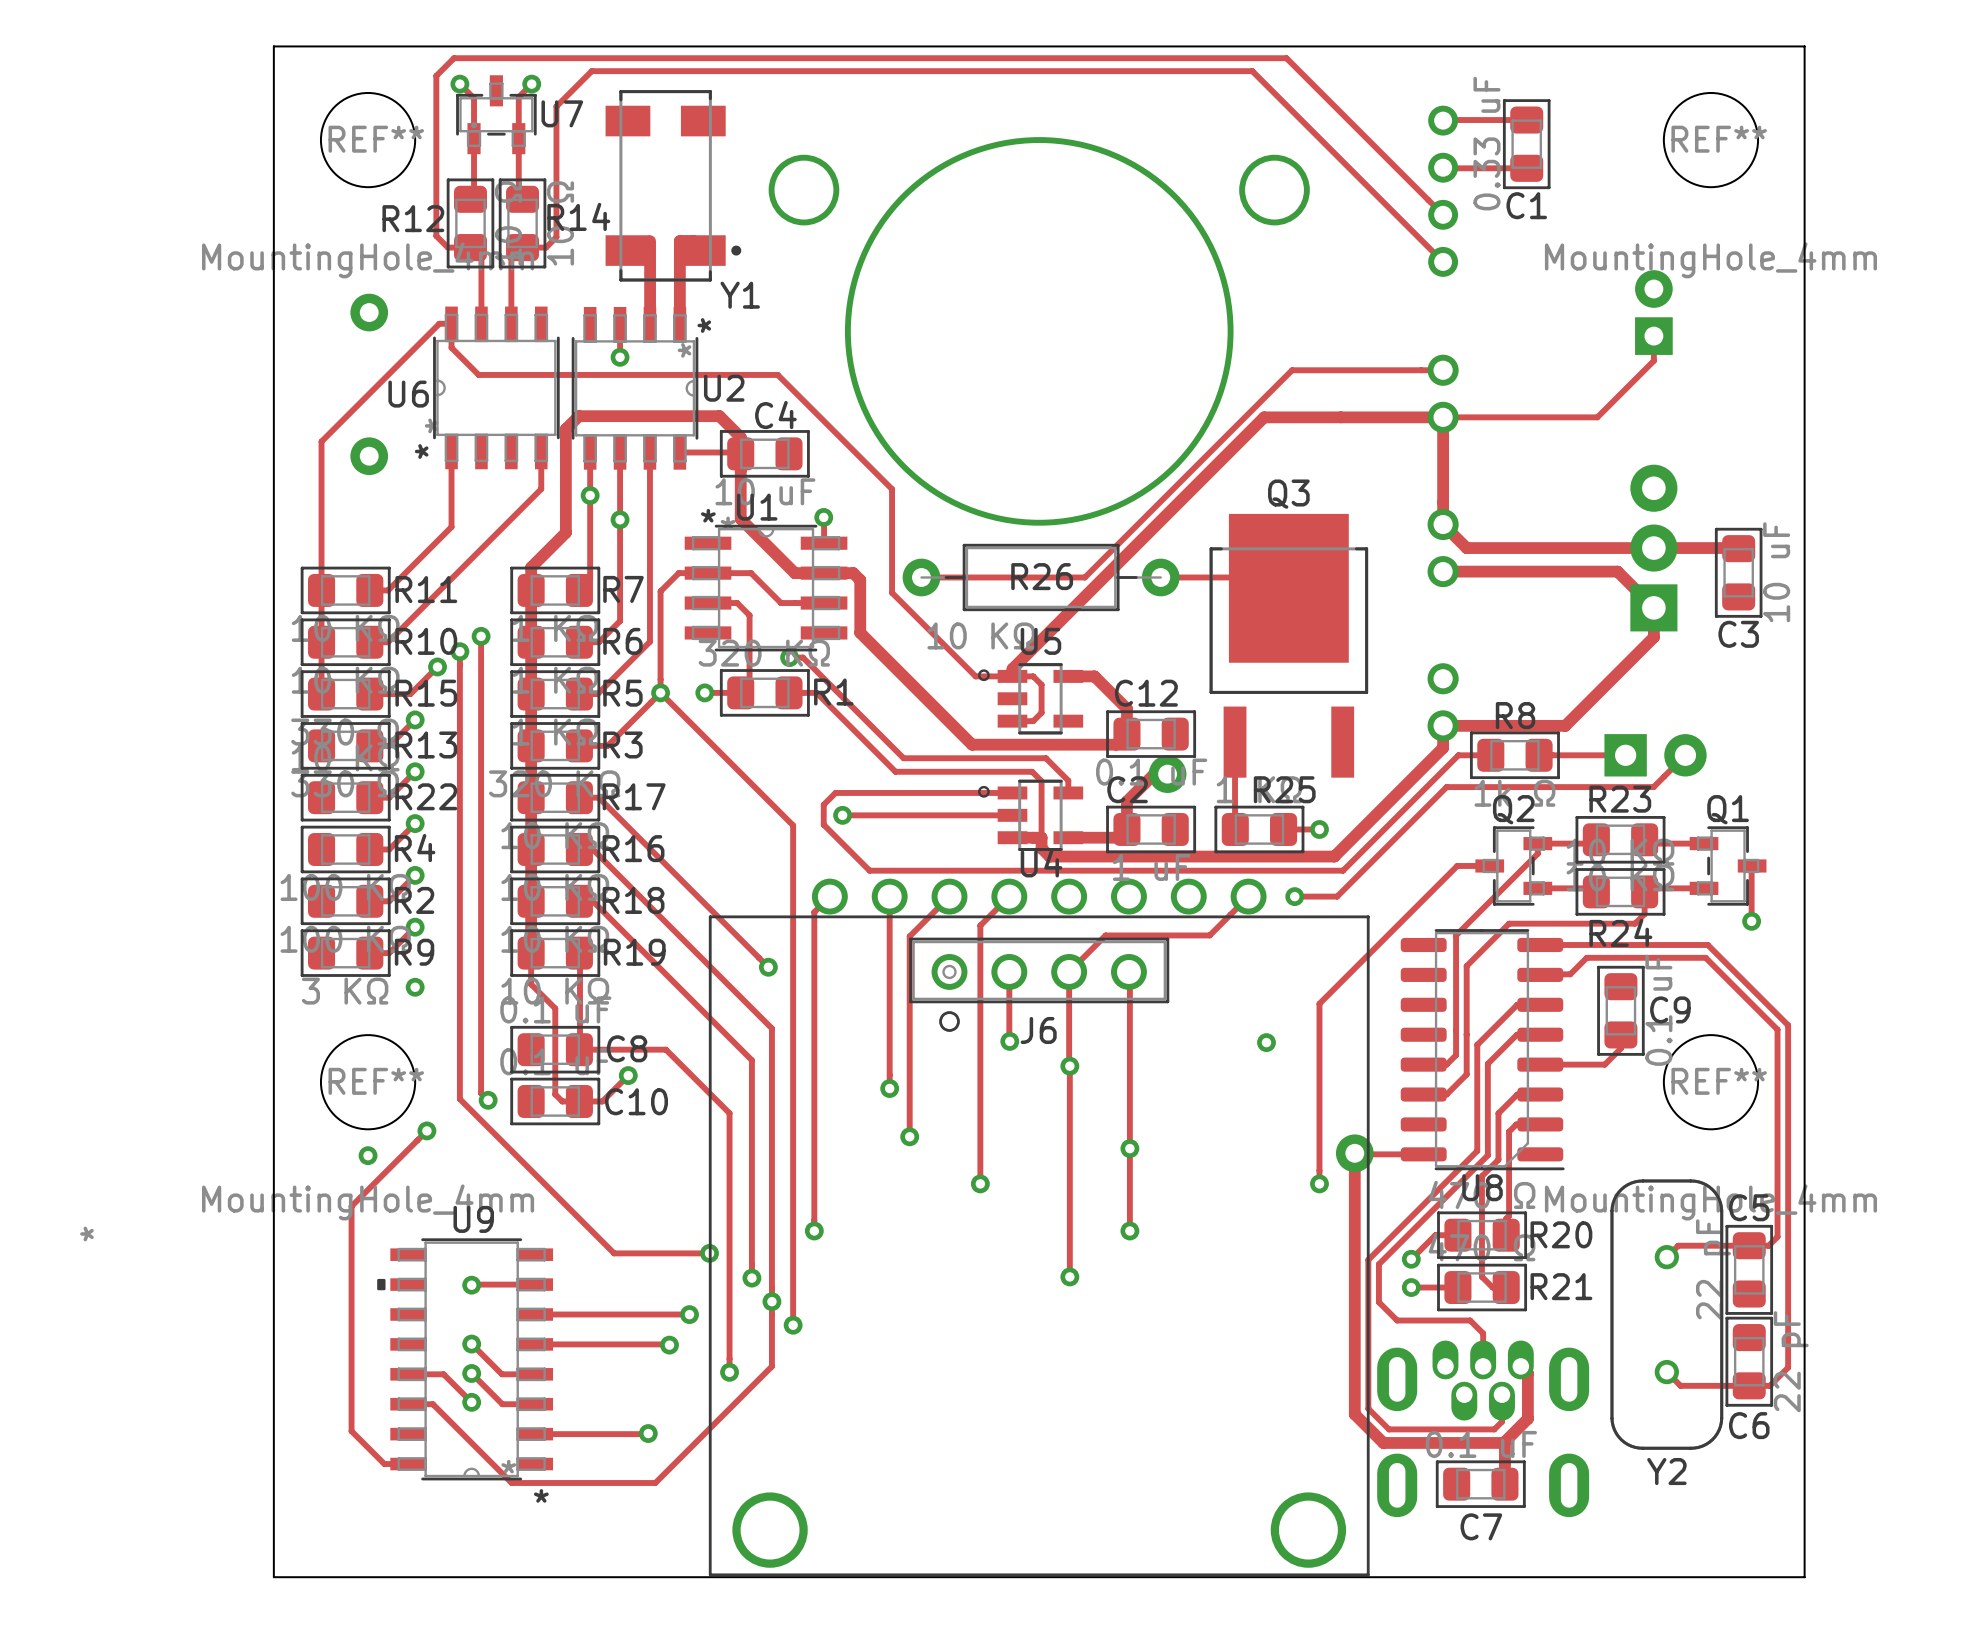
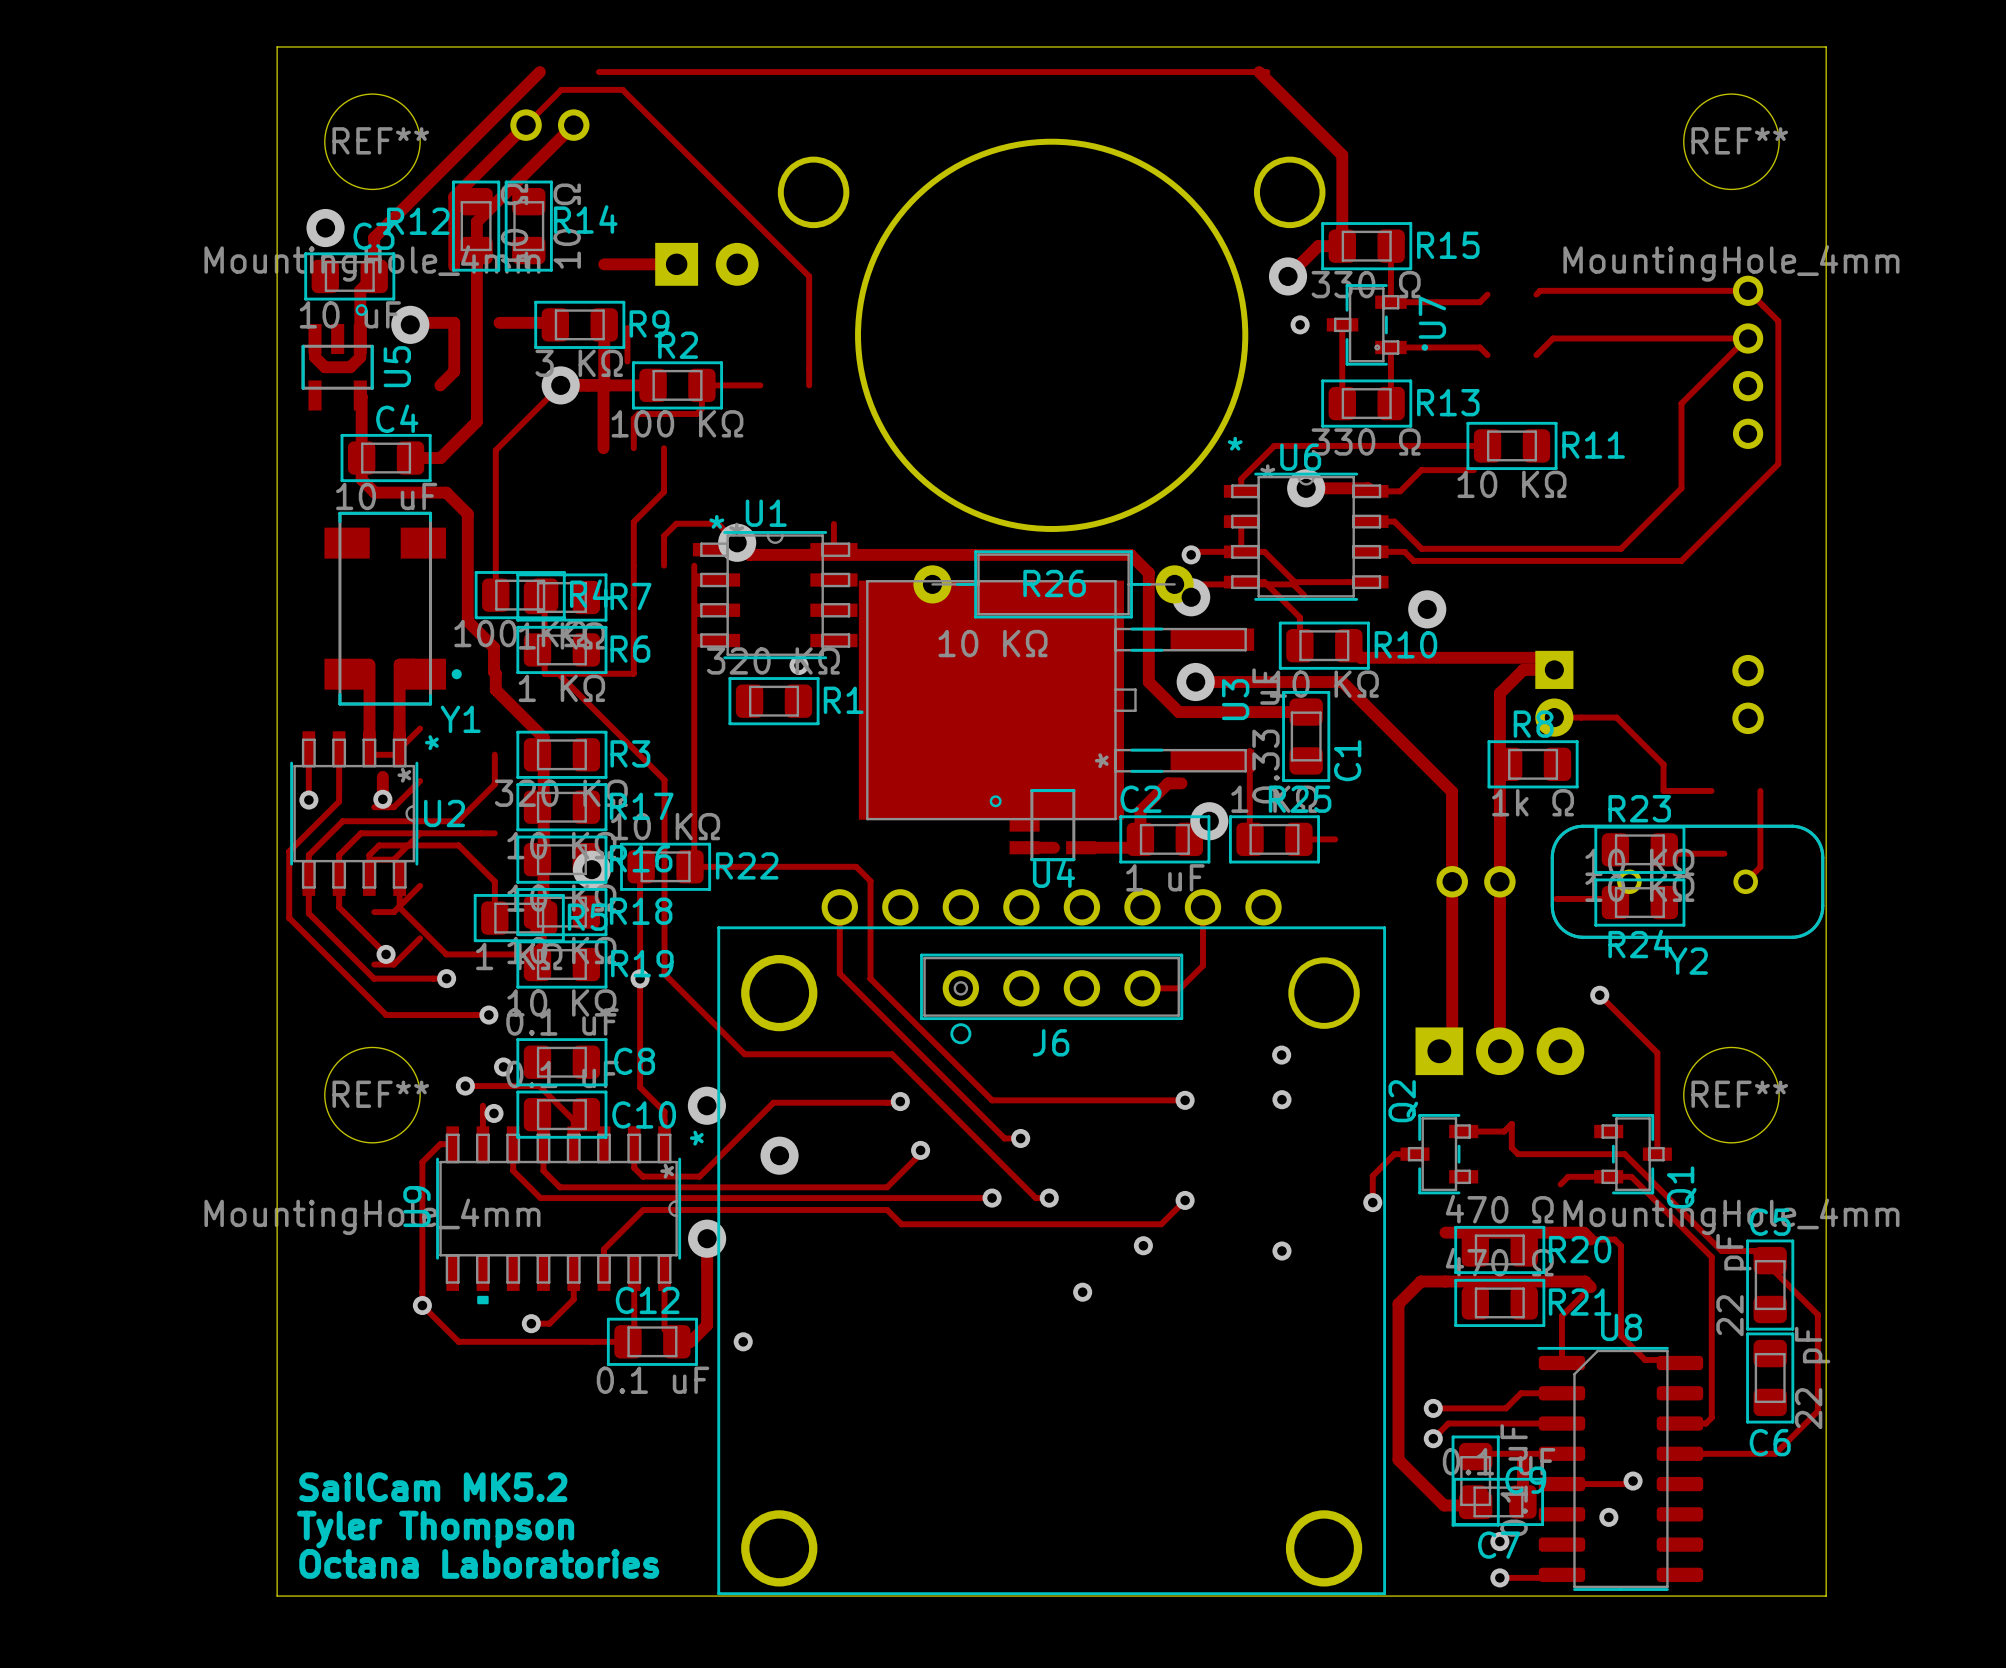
track: none -> (539, 72) (374, 237) (374, 276) (360, 290) (360, 357) (350, 367) (325, 367) (315, 357) (315, 339)
track: (591, 71) (556, 106) (556, 237) (546, 247) (522, 247) (511, 258) (511, 323) -> none
track: none -> (1259, 72) (1342, 155) (1342, 246) (1318, 246) (1288, 276)
track: (1252, 71) (1443, 261) -> none
U7 footprint: [456, 75, 537, 155] -> [1326, 284, 1429, 366]
track: (459, 84) (474, 98) (474, 195) (470, 199) -> none
via: (459, 84) -> none
track: (531, 84) (518, 97) (518, 195) (522, 199) -> none
via: (531, 84) -> none
track: (1526, 120) (1443, 120) -> none
part: none -> (549, 125)
track: none -> (573, 125) (476, 221) (476, 421) (440, 458) (410, 458)
C1 position: (1526, 144) -> (1306, 736)
track: (1443, 167) (1526, 168) -> none
Y1 position: (673, 185) -> (393, 608)
part position: (1443, 191) -> (1748, 362)
C1 name rotation: 0° (1526, 205) -> 90° counterclockwise (1347, 760)
track: (1443, 214) (1286, 58) (454, 58) (436, 75) (436, 236) (447, 247) (470, 247) (481, 258) (481, 323) -> none
via: none -> (325, 228)
track: none -> (1390, 240) (1390, 302) (1479, 302) (1487, 294)
track: (650, 241) (650, 325) -> (369, 664) (369, 749)
track: (703, 250) (693, 241) (679, 241) (679, 325) -> (423, 674) (413, 664) (399, 664) (399, 749)
track: none -> (604, 264) (676, 264)
part: none -> (706, 264)
track: none -> (454, 266) (454, 196) (561, 89) (622, 89) (809, 276) (809, 385)
via: none -> (1288, 276)
track: none -> (1536, 294) (1540, 290) (1748, 290) (1778, 321) (1778, 464) (1681, 560) (1413, 560) (1404, 551) (1371, 551)
U6 footprint: [433, 306, 560, 470] -> [1223, 472, 1389, 601]
via position: (369, 312) -> (410, 324)
part rotation: 0° (1653, 312) -> 180° (1554, 693)
part position: (1653, 312) -> (1554, 693)
track: none -> (499, 322) (553, 322) (555, 324)
track: none -> (410, 324) (412, 322) (454, 322) (454, 371) (440, 385)
track: none -> (604, 324) (603, 448)
via: none -> (1300, 324)
track: none -> (1342, 325) (1342, 409)
U2 text position: * (704, 325) -> * (431, 742)
track: none -> (1746, 338) (1681, 403) (1681, 488) (1620, 548) (1421, 548) (1394, 521) (1371, 521)
track: none -> (1748, 338) (1553, 338) (1536, 355)
track: (1653, 336) (1653, 360) (1597, 417) (1443, 417) -> none
track: none -> (1487, 355) (1479, 347) (1390, 347) (1390, 409)
via: (620, 357) -> none
track: (1443, 370) (1292, 370) (1084, 577) (921, 577) -> none
via: none -> (560, 385)
track: none -> (653, 385) (560, 385) (495, 450) (495, 595)
track: none -> (760, 385) (701, 385) (701, 408) (696, 414) (638, 414) (633, 418) (633, 448)
U2 position: (635, 388) -> (354, 813)
track: none -> (360, 395) (361, 479) (374, 492) (446, 492) (467, 514) (467, 621) (493, 647) (495, 689) (543, 737) (543, 942) (531, 954) (446, 954) (399, 907) (399, 878)
part: (1443, 393) -> none
U6 name position: U6 (408, 394) -> U6 (1300, 457)
track: (1443, 417) (1443, 524) (1466, 548) (1738, 548) -> none
track: (1443, 417) (1264, 417) (1012, 668) (1012, 676) -> none
track: none -> (664, 448) (664, 491) (633, 522) (633, 673) (544, 673) (544, 595)
track: none -> (1487, 451) (1481, 445) (1274, 445) (1241, 479) (1241, 491)
track: (451, 452) (451, 526) (388, 590) (369, 590) -> none
track: (541, 452) (541, 489) (388, 642) (369, 642) -> none
track: (590, 452) (590, 579) (579, 590) -> none
track: (620, 452) (620, 621) (598, 642) (579, 642) -> none
track: (649, 452) (649, 641) (597, 694) (579, 694) -> none
track: (679, 452) (740, 453) -> none
C4 position: (764, 453) -> (386, 458)
via: (369, 456) -> none
track: none -> (1473, 470) (1421, 470) (1400, 491) (1371, 491) (1368, 488) (1306, 488)
via: none -> (1306, 488)
via: (590, 495) -> none
track: none -> (1241, 521) (1241, 551)
via: (823, 517) -> none
via: (620, 519) -> none
via: none -> (737, 542)
track: none -> (1191, 554) (1194, 551) (1264, 551) (1294, 582) (1371, 582)
via: none -> (1191, 554)
part: (1443, 548) -> none
part rotation: 0° (1653, 548) -> 90° clockwise (1499, 1051)
part position: (1653, 548) -> (1499, 1051)
track: none -> (664, 565) (664, 536) (676, 523) (718, 523) (749, 554) (1130, 554) (1148, 573) (1148, 682) (1178, 712) (1306, 712)
track: none -> (694, 565) (694, 862) (690, 866)
track: (1443, 571) (1617, 571) (1653, 607) (1653, 637) (1565, 725) (1443, 725) (1443, 747) (1334, 856) (1049, 856) (1041, 848) (1041, 781) (1032, 771) (895, 771) (816, 692) (789, 692) -> none
C3 rotation: 0° (1738, 572) -> 90° clockwise (349, 276)
C3 position: (1738, 572) -> (349, 276)
track: none -> (1241, 582) (1264, 582) (1299, 617) (1299, 645)
R11 position: (345, 590) -> (1511, 445)
via: none -> (1191, 597)
via: none -> (1427, 609)
track: (708, 603) (737, 603) (749, 615) (749, 684) (740, 692) (704, 692) -> none
track: (824, 603) (781, 603) (751, 573) (678, 573) (660, 591) (660, 692) -> none
C3 name position: C3 (1738, 634) -> C3 (373, 236)
track: (481, 636) (481, 1093) (488, 1100) -> none
via: (481, 636) -> none
track: none -> (1348, 645) (1360, 657) (1542, 657) (1554, 669) (1523, 669) (1499, 693) (1499, 1051)
R10 position: (345, 642) -> (1324, 645)
Q3: (1288, 645) -> none
track: (459, 651) (459, 1099) (614, 1253) (709, 1253) -> none
via: (459, 651) -> none
track: (789, 657) (802, 657) (903, 758) (1045, 758) (1068, 780) (1068, 792) -> none
track: none -> (558, 673) (664, 779) (664, 974) (744, 1054) (892, 1054) (1035, 1198) (1049, 1198)
track: (437, 666) (410, 694) (369, 694) -> none
via: (437, 666) -> none
track: none -> (1195, 682) (1342, 682) (1452, 791) (1452, 881)
via: none -> (1195, 682)
track: (1068, 676) (1094, 676) (1126, 708) (1126, 734) (1116, 744) (972, 744) (860, 632) (860, 580) (853, 573) (794, 573) (740, 519) (740, 437) (719, 416) (578, 416) (565, 429) (565, 532) (531, 567) (531, 984) (555, 1008) (555, 1094) (562, 1101) (602, 1101) (628, 1075) -> none
part: none -> (1748, 694)
U3: none -> (1056, 700)
track: (660, 692) (607, 745) (579, 745) -> none
track: (660, 692) (793, 825) (793, 1325) -> none
via: (660, 692) -> none
via: (704, 692) -> none
track: (321, 694) (321, 441) (439, 323) (451, 323) (451, 347) (478, 374) (777, 374) (892, 489) (892, 592) (975, 676) (1033, 676) (1041, 684) (1041, 712) (1033, 721) (1012, 721) -> none
R15 position: (345, 694) -> (1366, 246)
R5 position: (555, 694) -> (519, 918)
U5 rotation: 0° (1030, 698) -> 90° clockwise (337, 357)
U5 position: (1030, 698) -> (337, 357)
part: (1443, 702) -> none
track: none -> (1554, 717) (1616, 717) (1663, 764) (1663, 790) (1711, 790)
via: (415, 719) -> none
C12 position: (1151, 734) -> (652, 1341)
track: none -> (308, 748) (308, 799)
track: none -> (339, 748) (339, 801) (289, 851) (289, 918) (386, 1015) (488, 1015)
R13 position: (345, 745) -> (1366, 403)
track: none -> (494, 754) (494, 784) (457, 821) (342, 821) (308, 855) (308, 913) (373, 978) (446, 978)
track: (1490, 755) (1458, 755) (1343, 870) (869, 870) (823, 824) (823, 804) (835, 792) (1012, 792) -> none
track: (1539, 755) (1625, 755) -> none
part: (1655, 755) -> none
track: (1685, 755) (1653, 787) (1446, 787) (1337, 896) (1294, 896) -> none
track: none -> (382, 776) (382, 800)
via: (415, 771) -> none
via position: (1167, 774) -> (1209, 821)
track: none -> (1760, 790) (1760, 867) (1745, 881)
via: none -> (382, 799)
via: none -> (308, 800)
R22 position: (345, 797) -> (665, 866)
track: (579, 797) (598, 797) (768, 967) -> none
Q2 name rotation: 0° (1513, 809) -> 90° counterclockwise (1403, 1101)
Q1 name rotation: 0° (1728, 809) -> 90° counterclockwise (1681, 1187)
Q1 name position: Q1 (1728, 809) -> Q1 (1681, 1187)
track: (842, 815) (1012, 815) -> none
via: (842, 815) -> none
via: (415, 823) -> none
track: none -> (494, 833) (360, 833) (339, 855) (339, 907) (386, 954)
via: (1319, 829) -> none
track: (1596, 839) (1592, 843) (1537, 843) (1537, 853) (1456, 935) (1456, 1055) (1446, 1064) (1423, 1064) -> none
R4 position: (345, 849) -> (520, 595)
track: (579, 849) (592, 849) (771, 1028) (771, 1366) (655, 1482) (511, 1482) (432, 1404) (407, 1404) -> none
track: none -> (641, 866) (640, 1087) (664, 1111) (664, 1144)
track: none -> (694, 866) (856, 866) (870, 881) (870, 978) (992, 1100) (1185, 1100)
via: none -> (591, 869)
track: (1489, 865) (1457, 865) (1319, 1003) (1319, 1183) -> none
Q2 position: (1513, 865) -> (1439, 1154)
Q1 position: (1728, 865) -> (1633, 1154)
track: (1752, 865) (1751, 921) -> none
track: none -> (369, 878) (369, 855) (379, 845) (458, 845) (494, 881) (494, 918)
track: none -> (1452, 881) (1452, 1038) (1439, 1051)
part: none -> (1476, 881)
via: (415, 875) -> none
track: (1704, 888) (1648, 888) (1644, 891) (1644, 914) (1635, 923) (1509, 923) (1466, 966) (1466, 1074) (1446, 1094) (1423, 1094) -> none
track: (829, 896) (814, 912) (814, 1231) -> none
track: (889, 896) (889, 1088) -> none
track: (949, 896) (909, 936) (909, 1136) -> none
track: (1009, 896) (980, 925) (980, 1183) -> (513, 1144) (513, 1170) (540, 1198) (991, 1198)
track: none -> (1202, 907) (1202, 965) (1180, 988) (1142, 988)
track: (1248, 896) (1209, 935) (1105, 935) (1069, 971) (1069, 1276) -> none
via: (1294, 896) -> none
R2 name position: R2 (414, 900) -> R2 (678, 345)
R2 position: (345, 901) -> (677, 385)
track: (579, 901) (592, 901) (751, 1060) (751, 1278) -> none
track: none -> (839, 917) (839, 973) (1004, 1138) (1020, 1138)
J6 footprint: [708, 915, 1370, 1577] -> [717, 926, 1387, 1596]
via: (1751, 921) -> none
via: (415, 927) -> none
via: none -> (386, 954)
track: (1540, 944) (1707, 944) (1788, 1025) (1788, 1367) (1769, 1385) (1680, 1385) (1666, 1372) -> none
R9 position: (345, 953) -> (579, 324)
track: (579, 953) (580, 1047) (578, 1049) -> none
via: none -> (446, 978)
via: none -> (640, 978)
via: (768, 967) -> none
track: (1009, 971) (1009, 1041) -> none
track: (1128, 971) (1129, 1231) -> none
track: (1540, 974) (1570, 974) (1586, 957) (1705, 957) (1777, 1029) (1777, 1236) (1768, 1245) (1678, 1245) (1666, 1257) -> none
track: none -> (1599, 995) (1657, 1052) (1657, 1154)
via: none -> (1599, 995)
via: (415, 987) -> none
via: none -> (488, 1015)
track: (1540, 1004) (1517, 1004) (1477, 1044) (1477, 1150) (1368, 1259) (1368, 1408) (1388, 1429) (1494, 1429) (1501, 1421) (1501, 1394) -> none
C9 position: (1620, 1010) -> (1475, 1481)
track: (1540, 1034) (1516, 1034) (1487, 1063) (1487, 1155) (1378, 1264) (1378, 1302) (1397, 1320) (1470, 1320) (1483, 1333) (1483, 1366) -> none
track: (1620, 1034) (1620, 1048) (1604, 1064) (1540, 1064) -> none
via: (1009, 1041) -> none
track: (579, 1049) (665, 1049) (729, 1113) (729, 1372) -> none
U8 rotation: 0° (1482, 1049) -> 180° (1620, 1468)
U8 position: (1482, 1049) -> (1620, 1468)
via: none -> (503, 1066)
via: (1069, 1066) -> none
track: none -> (465, 1086) (539, 1086) (573, 1120) (573, 1144)
via: none -> (465, 1086)
via: (628, 1075) -> none
via: none -> (1281, 1099)
via: none -> (1185, 1100)
track: none -> (900, 1102) (773, 1102) (699, 1176) (642, 1176) (634, 1167) (634, 1144)
track: none -> (482, 1105) (482, 1144)
via: none -> (706, 1105)
track: (1540, 1094) (1517, 1094) (1498, 1113) (1498, 1159) (1481, 1176) (1481, 1276) (1492, 1287) (1506, 1287) -> none
track: none -> (1463, 1131) (1504, 1131) (1511, 1123) (1511, 1147) (1518, 1154) (1624, 1154) (1721, 1251) (1754, 1251) (1817, 1314) (1817, 1411) (1775, 1453) (1679, 1453)
track: (1540, 1124) (1516, 1124) (1509, 1131) (1509, 1215) (1506, 1218) (1506, 1235) -> none
via: none -> (1020, 1138)
track: (426, 1130) (351, 1206) (351, 1431) (384, 1464) (407, 1464) -> none
via: (426, 1130) -> none
track: none -> (452, 1144) (440, 1144) (422, 1162) (422, 1305) (458, 1341) (628, 1341) (634, 1335) (634, 1273)
track: none -> (543, 1144) (543, 1170) (559, 1187) (887, 1187) (924, 1149)
track: none -> (1415, 1154) (1394, 1154) (1372, 1175) (1372, 1202)
via: none -> (779, 1155)
via: (1129, 1148) -> none
via: (1354, 1153) -> none
track: (1423, 1154) (1354, 1153) (1354, 1414) (1383, 1442) (1503, 1442) (1527, 1418) (1527, 1373) (1520, 1366) -> none
via: (368, 1155) -> none
track: none -> (1560, 1184) (1568, 1176) (1631, 1176) (1711, 1257) (1711, 1417) (1705, 1423) (1679, 1423)
via: none -> (1049, 1198)
via: (1319, 1183) -> none
track: none -> (1185, 1200) (1161, 1224) (901, 1224) (887, 1209) (643, 1209) (604, 1249) (604, 1273)
via: none -> (1185, 1200)
via: none -> (1372, 1202)
track: none -> (1445, 1232) (1583, 1232) (1590, 1239) (1614, 1239) (1620, 1245) (1620, 1335) (1645, 1359) (1676, 1359) (1679, 1363)
track: none -> (707, 1238) (707, 1325) (690, 1341) (676, 1341) (664, 1329) (664, 1273)
via: none -> (707, 1238)
via: (814, 1231) -> none
track: (1457, 1235) (1435, 1235) (1411, 1259) -> none
via: none -> (1281, 1251)
via: (709, 1253) -> none
track: none -> (573, 1273) (573, 1299) (549, 1323) (531, 1323)
via: (1411, 1259) -> none
via: (751, 1278) -> none
track: (535, 1284) (472, 1284) (472, 1286) -> none
via: (471, 1285) -> none
track: (1411, 1287) (1457, 1287) -> none
via: (1411, 1287) -> none
via: none -> (422, 1305)
via: (771, 1301) -> none
via: none -> (531, 1323)
track: (535, 1314) (689, 1314) -> none
via: (689, 1314) -> none
Y2 rotation: 0° (1666, 1314) -> 90° clockwise (1687, 881)
Y2 position: (1666, 1314) -> (1687, 881)
via: none -> (743, 1341)
via: (793, 1325) -> none
track: (471, 1344) (501, 1374) (535, 1374) -> none
via: (471, 1344) -> none
track: (535, 1344) (669, 1345) -> none
via: (669, 1345) -> none
track: none -> (1561, 1363) (1561, 1315) (1590, 1287) (1585, 1281) (1420, 1281) (1398, 1303) (1398, 1459) (1444, 1505) (1475, 1505)
U9 rotation: 0° (465, 1359) -> 90° counterclockwise (558, 1215)
U9 position: (465, 1359) -> (558, 1215)
via: (729, 1372) -> none
track: (471, 1373) (502, 1404) (535, 1404) -> none
via: (471, 1373) -> none
track: (407, 1374) (443, 1374) (471, 1402) -> none
track: none -> (1561, 1393) (1521, 1393) (1505, 1408) (1433, 1408)
via: none -> (1433, 1408)
via: (471, 1402) -> none
track: none -> (1561, 1423) (1448, 1423) (1433, 1438)
via: none -> (1433, 1438)
part: (1483, 1428) -> none
track: (648, 1433) (535, 1434) -> none
via: (648, 1433) -> none
track: none -> (1561, 1453) (1478, 1453) (1475, 1456)
track: none -> (1633, 1481) (1630, 1484) (1561, 1484)
via: none -> (1633, 1481)
text: none -> SailCam MK5.2 (433, 1487)
Y2 name position: Y2 (1666, 1471) -> Y2 (1687, 961)
via: none -> (1608, 1517)
text: none -> Tyler Thompson (435, 1529)
via: none -> (1499, 1541)
text: none -> Octana Laboratories (479, 1563)
track: none -> (1561, 1574) (1558, 1577) (1499, 1577)
via: none -> (1499, 1577)

